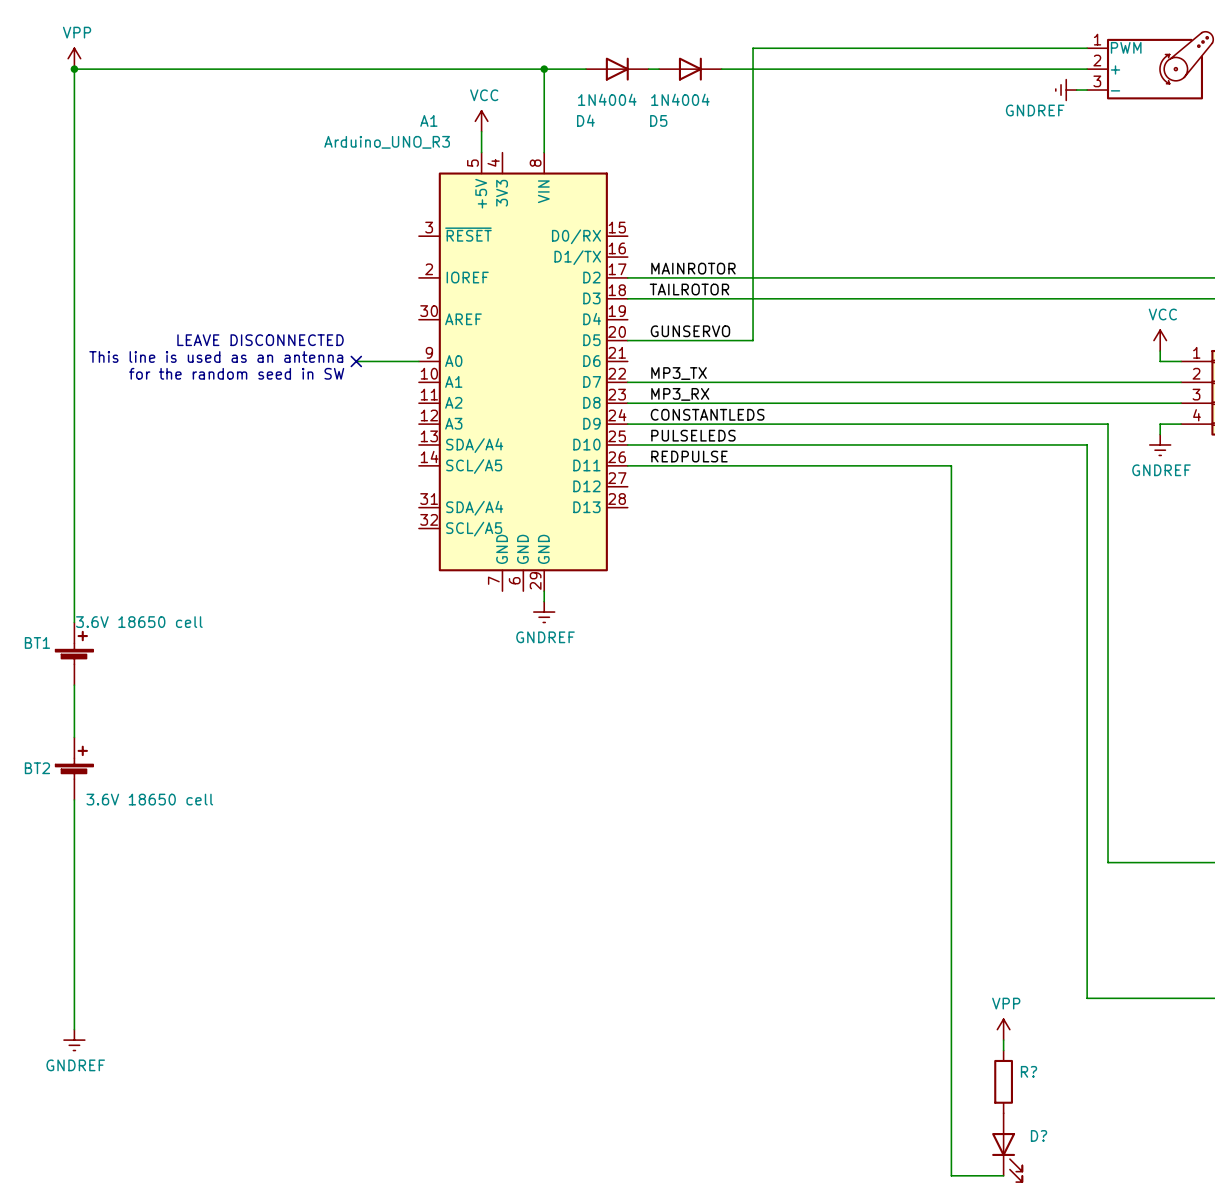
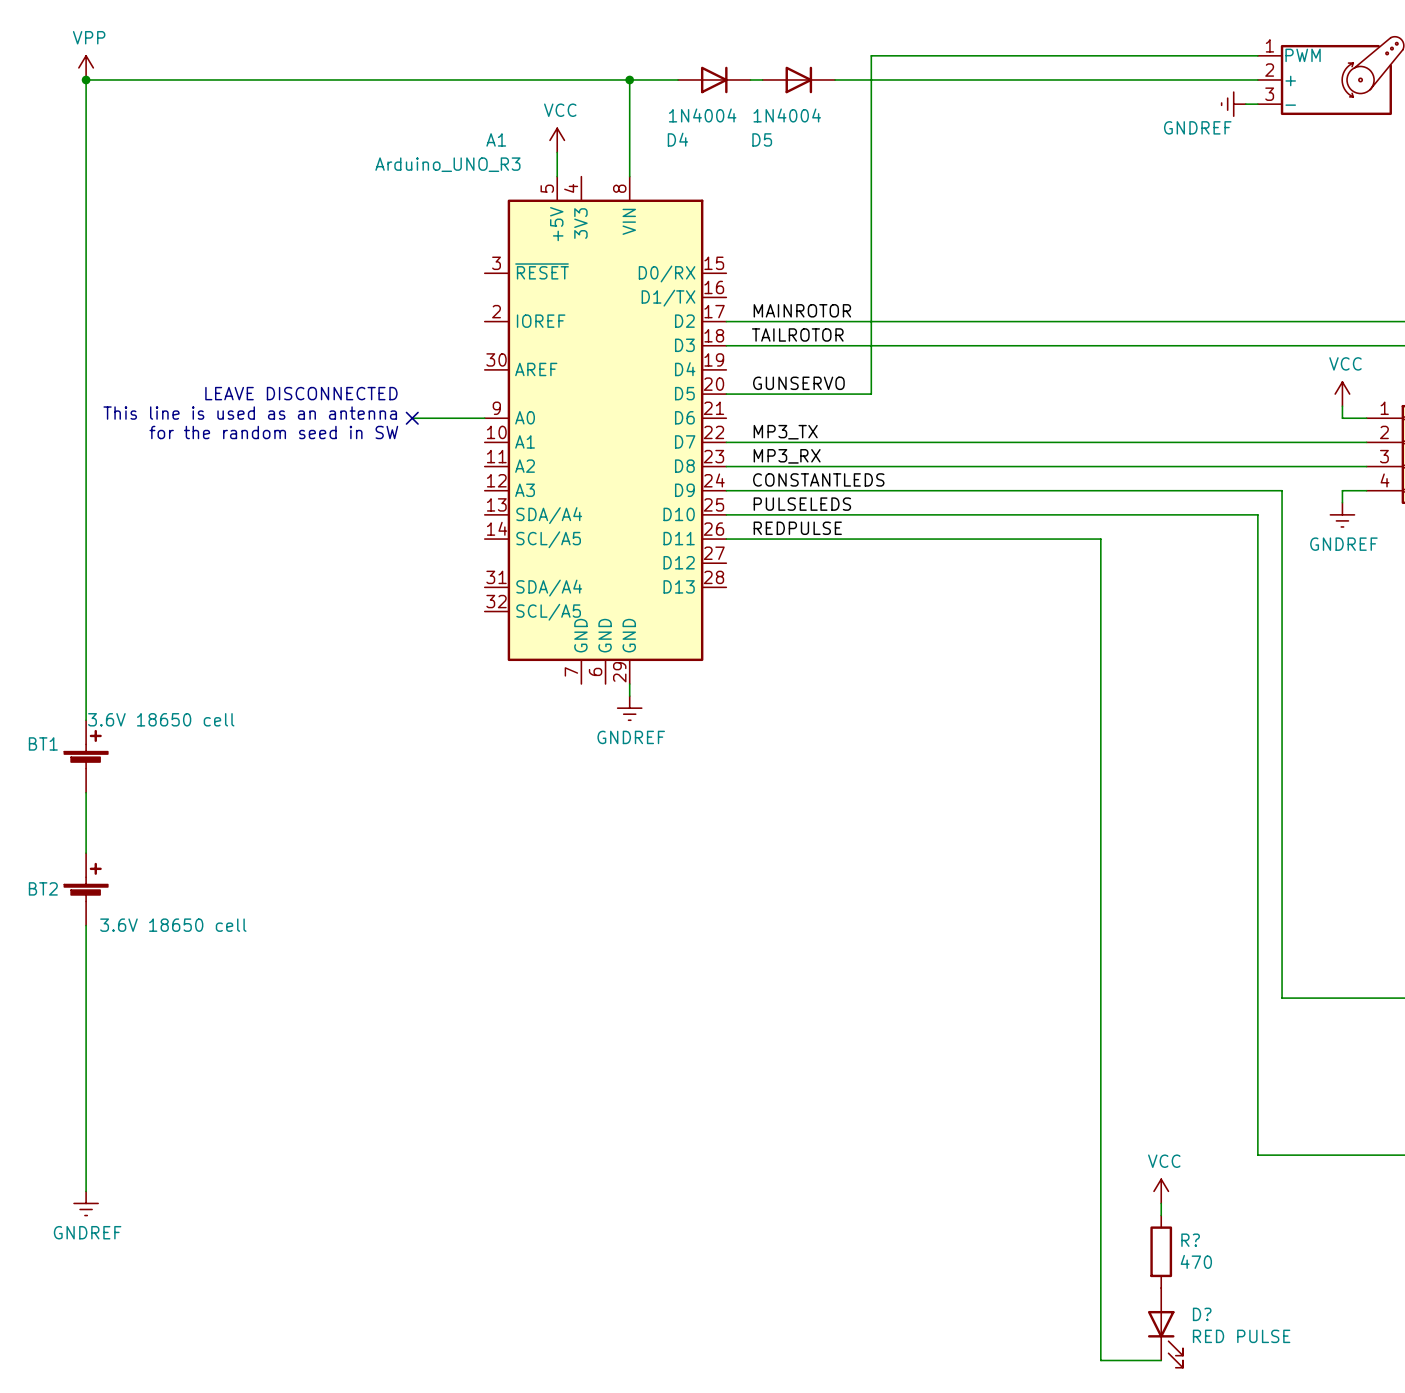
power symbol: VPP (1003, 1029) -> VCC (1161, 1191)
R? value: none -> 470 (1196, 1261)
D? value: none -> RED PULSE (1241, 1336)

